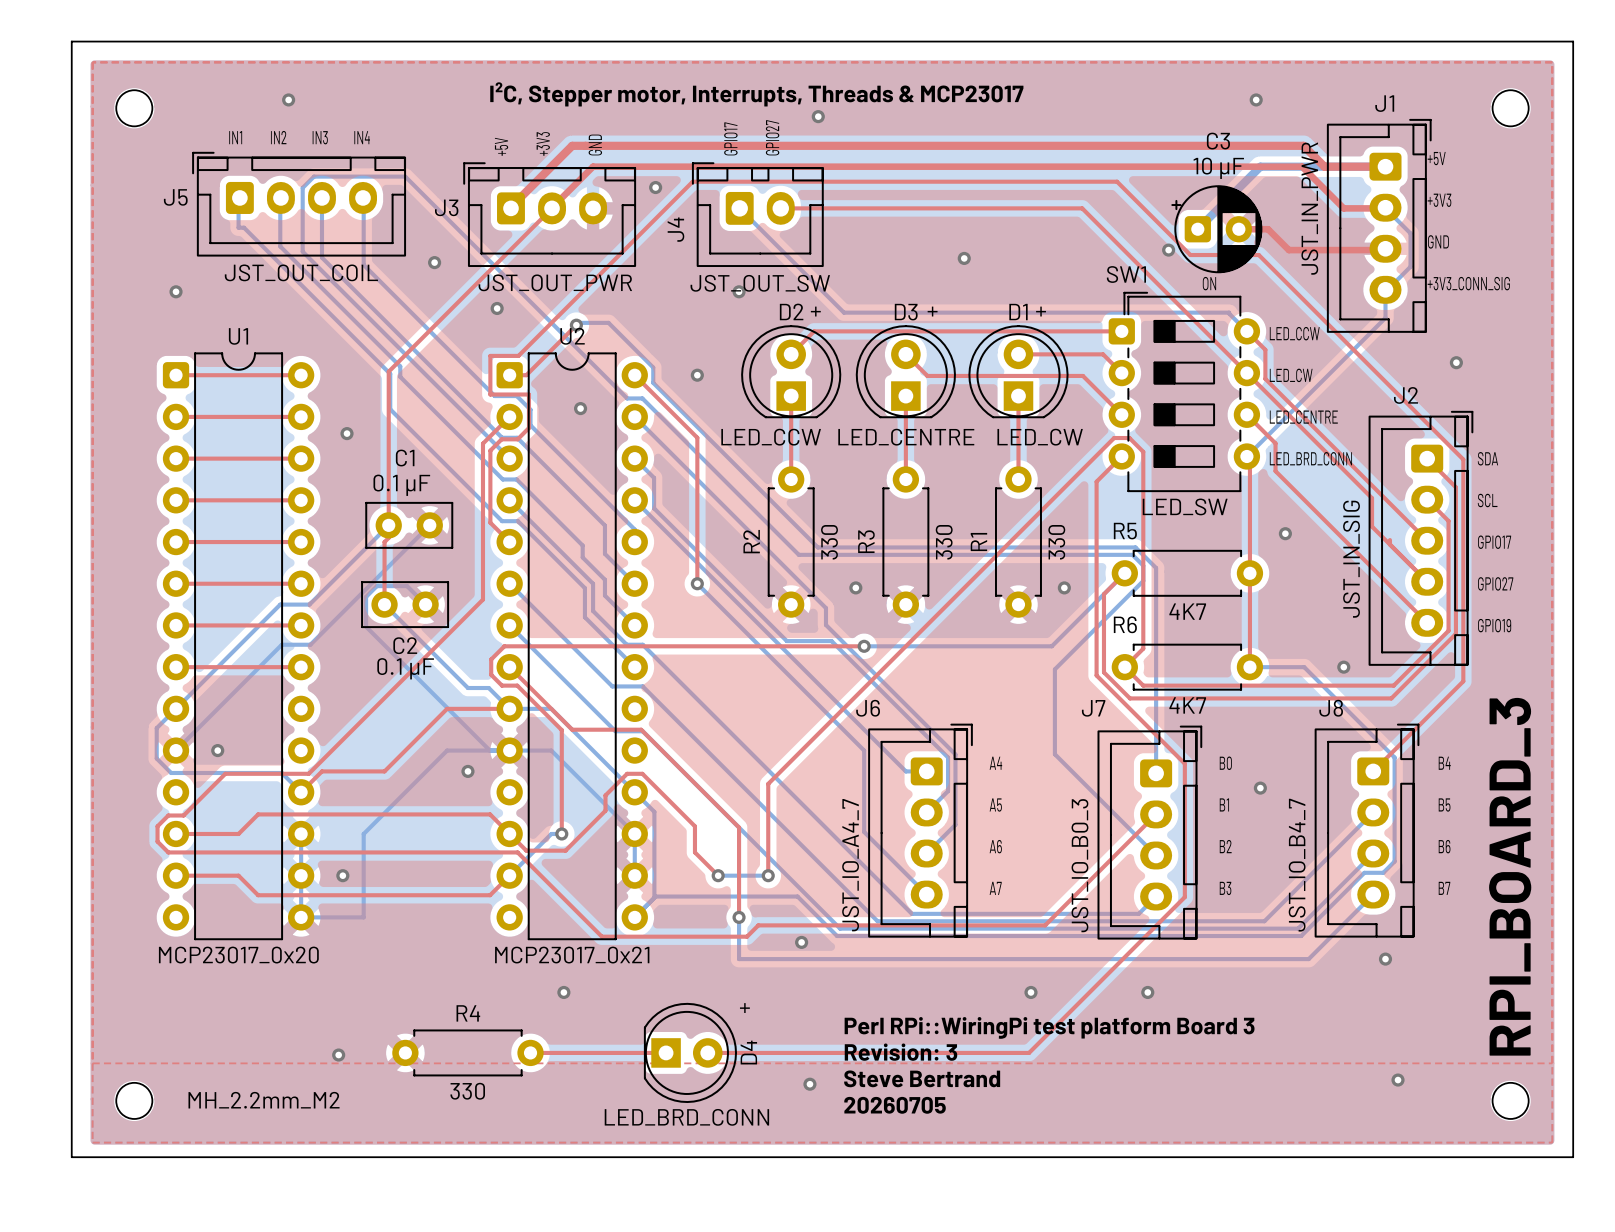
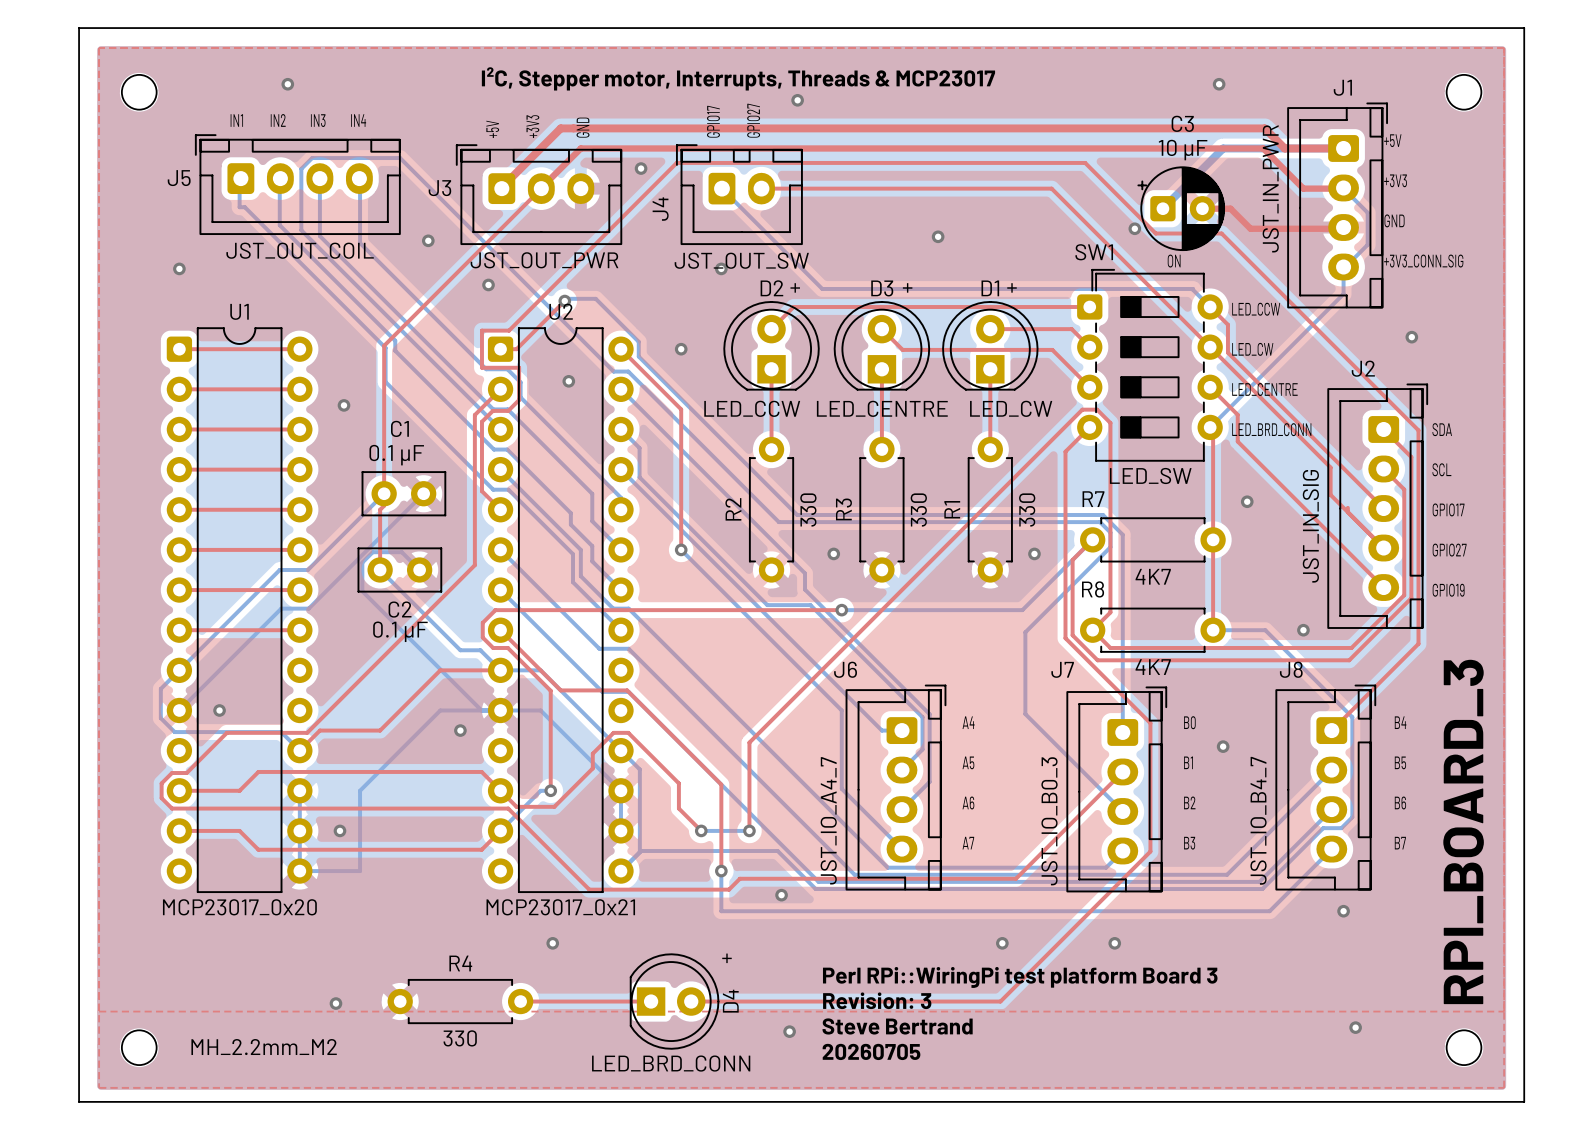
R5 name: R5 (1125, 531) -> R7 (1093, 499)
R6 name: R6 (1125, 624) -> R8 (1093, 589)

